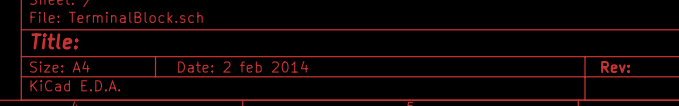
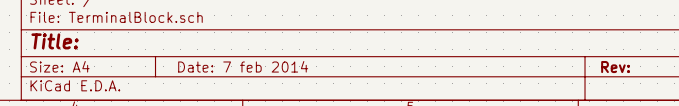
title block: Date: 2 feb 2014 (243, 66) -> Date: 7 feb 2014 (243, 66)

